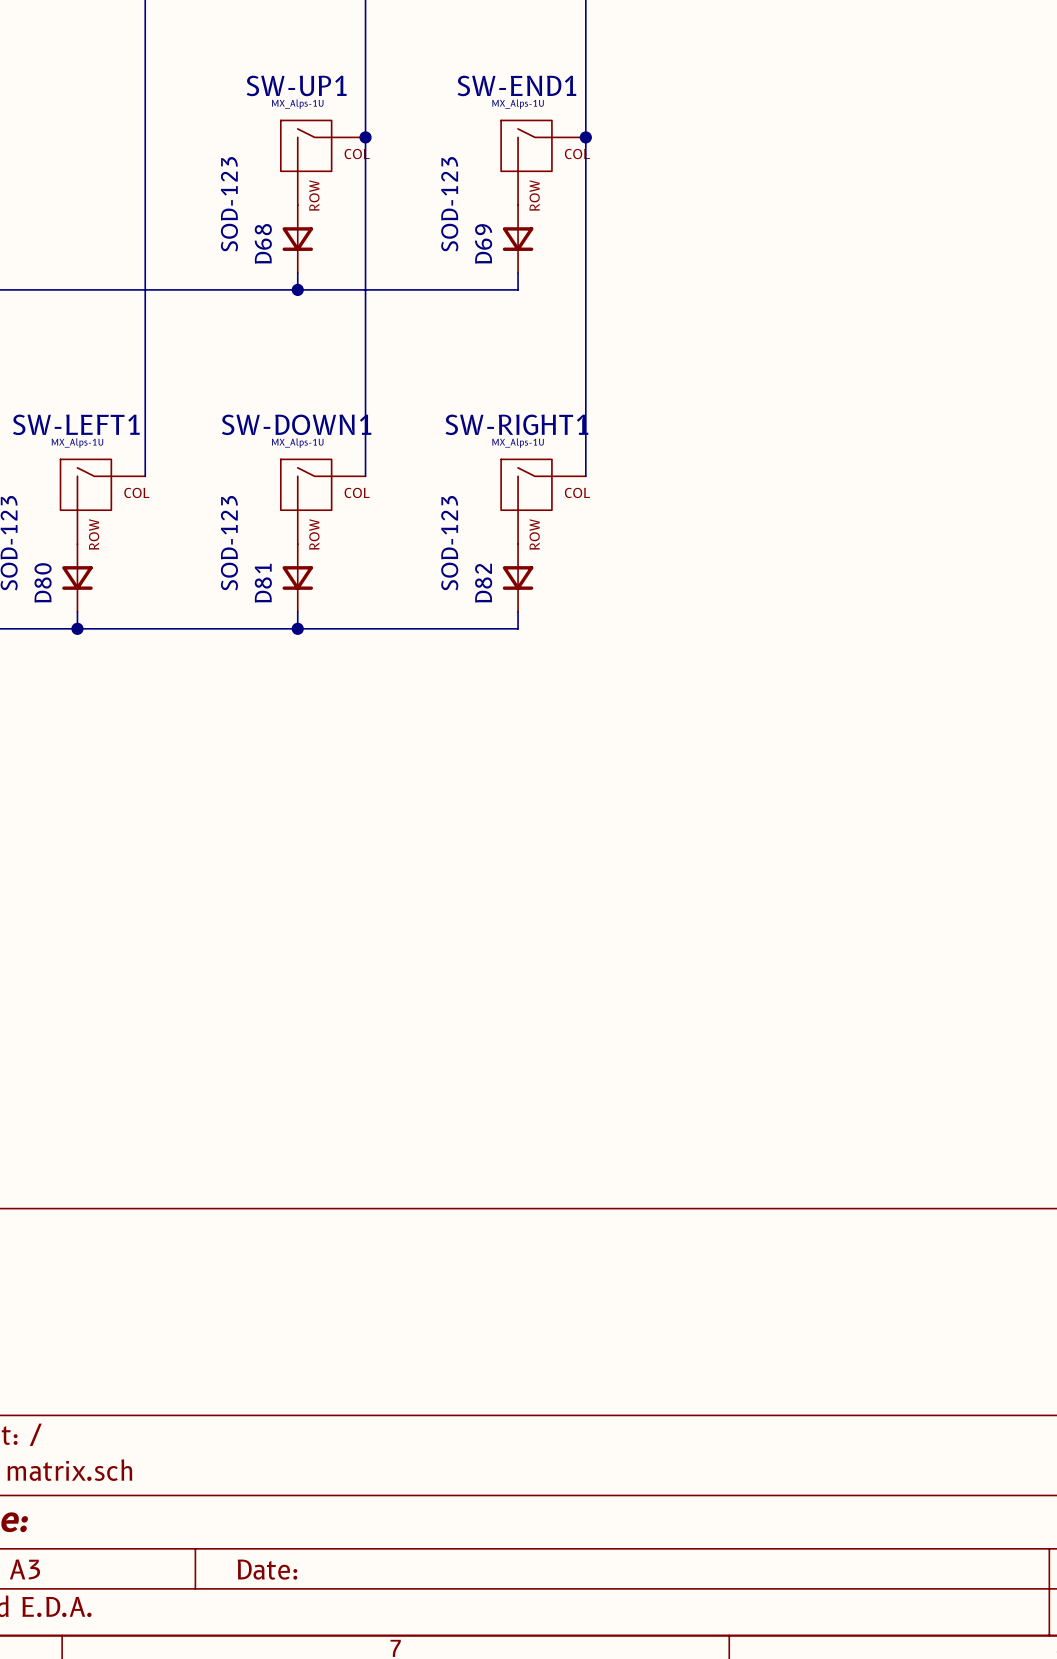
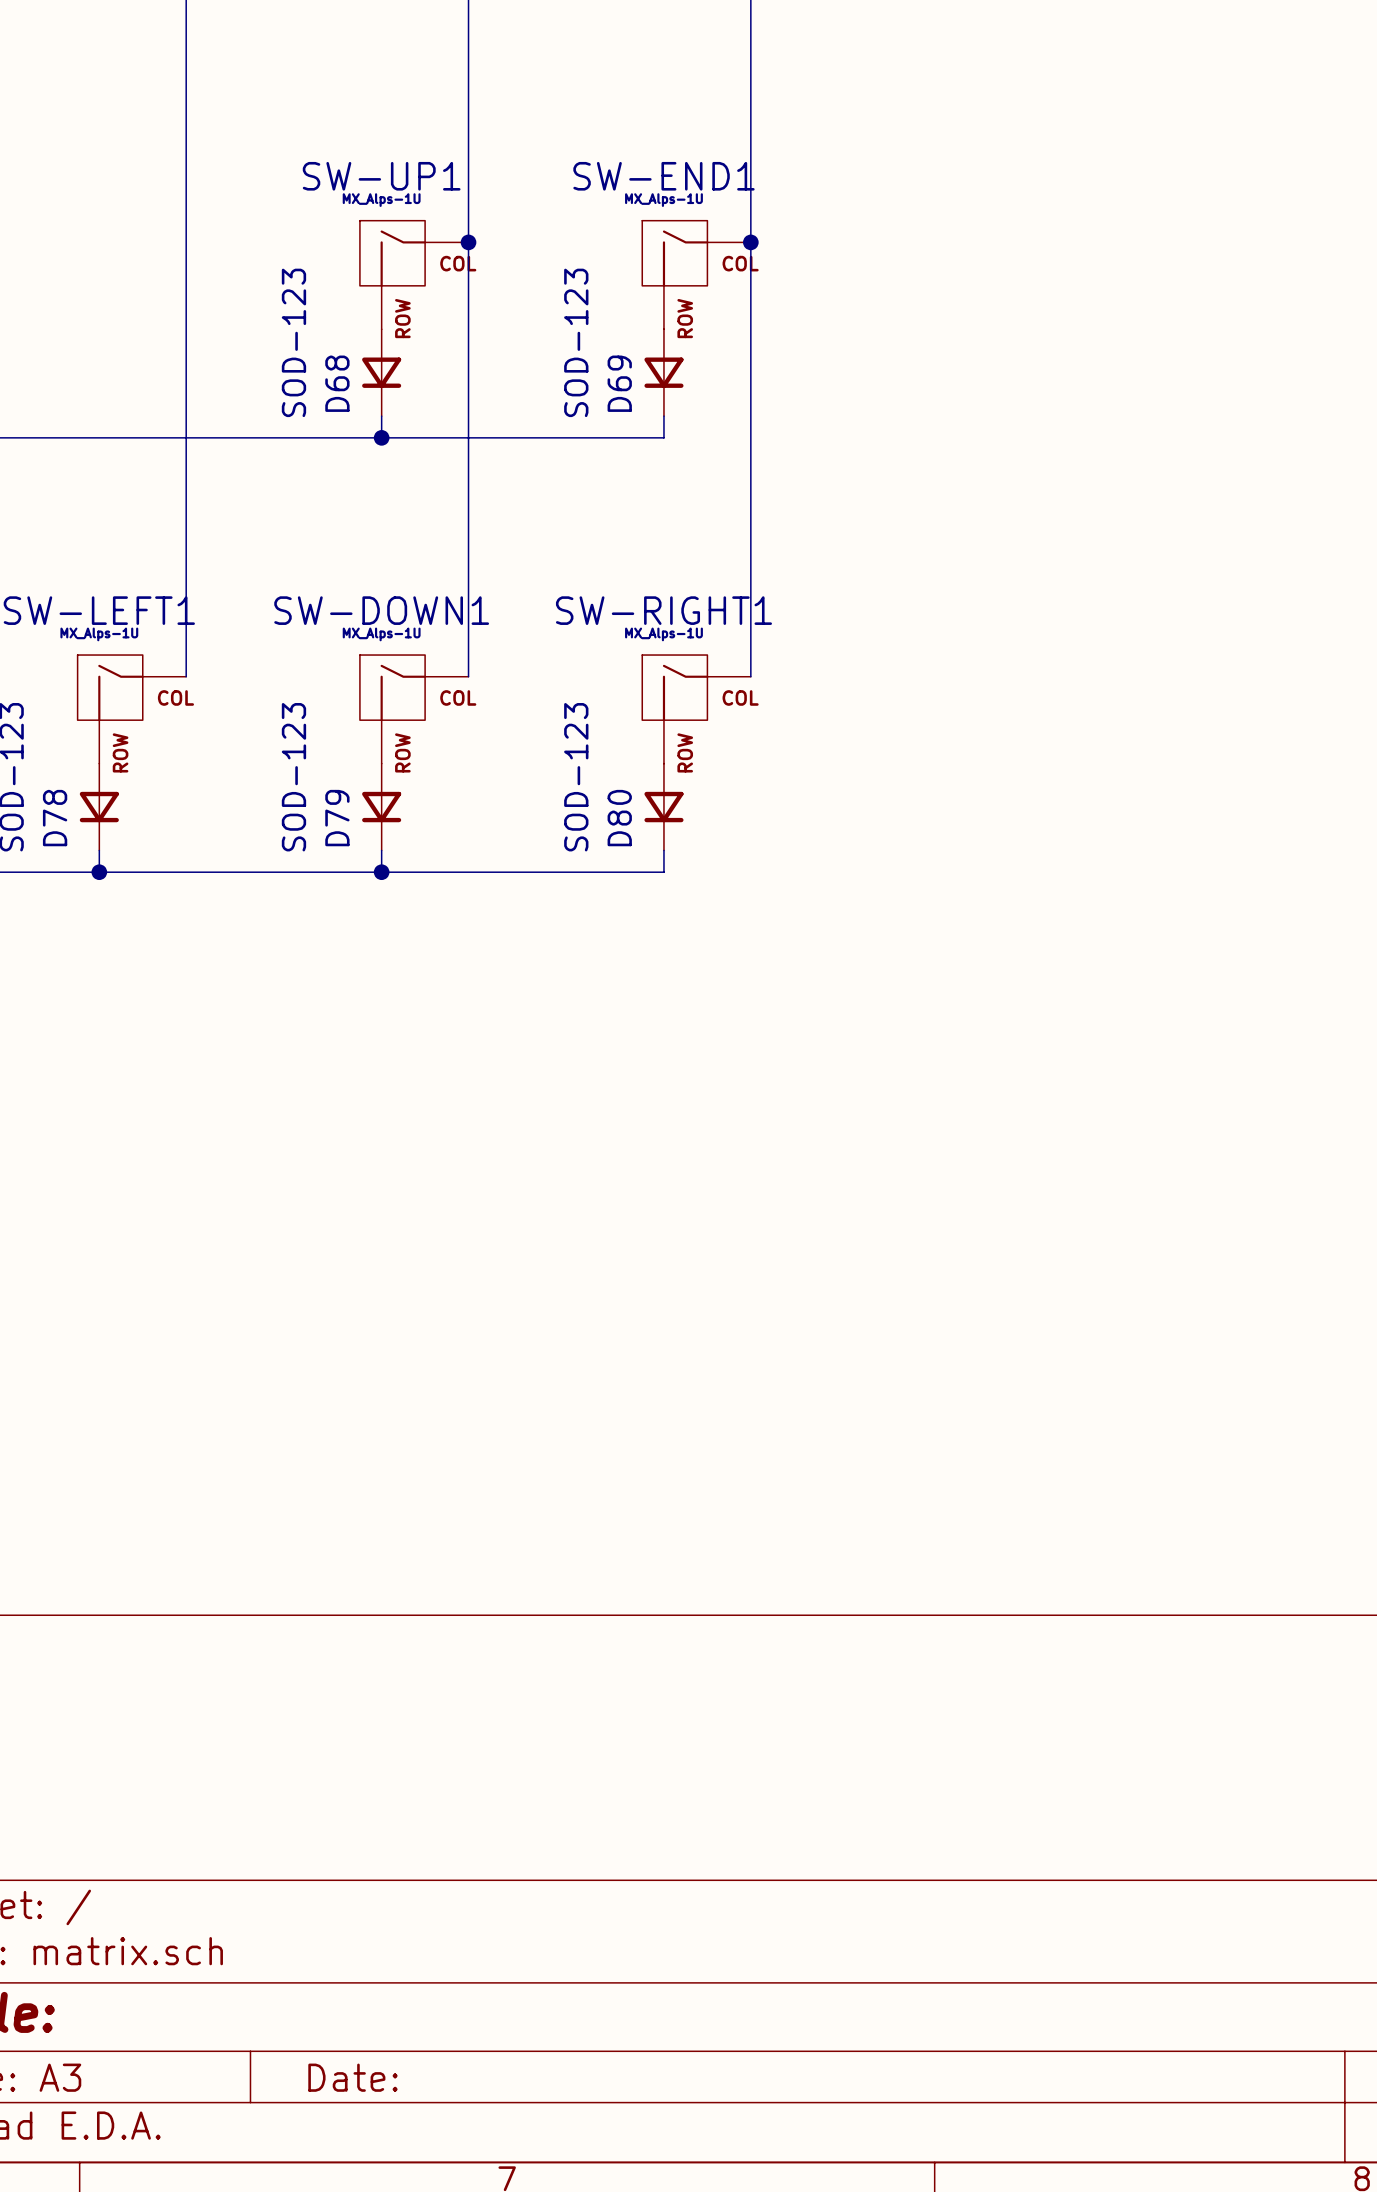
D80 name: D80 (43, 582) -> D78 (55, 818)
D81 name: D81 (263, 583) -> D79 (337, 818)
D82 name: D82 (483, 583) -> D80 (619, 818)

